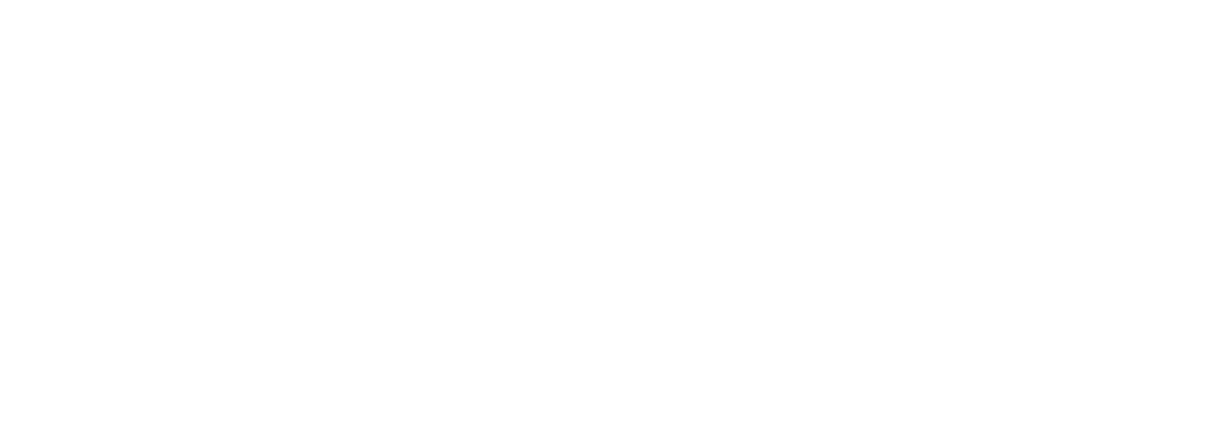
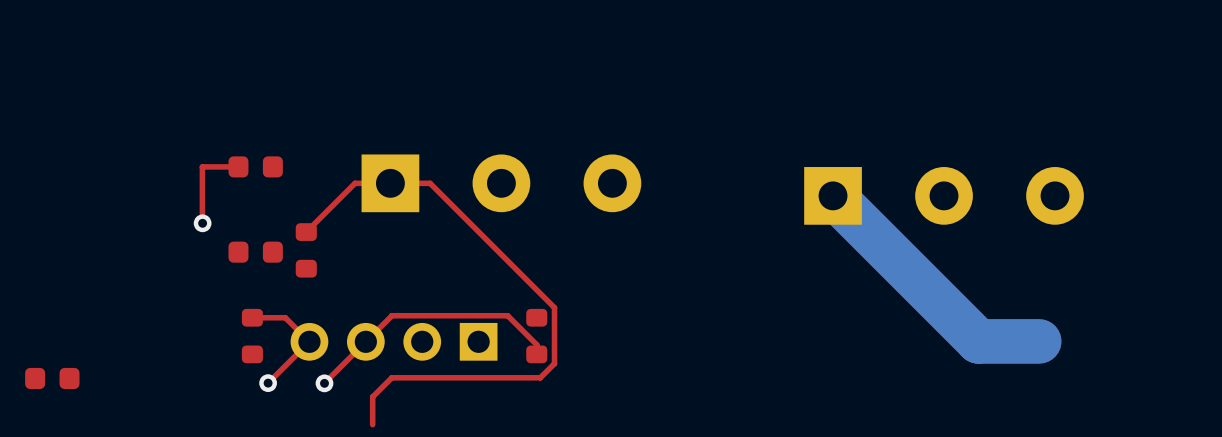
top track: none -> (238, 166) (202, 166) (202, 223)
part: none -> (255, 166)
part: none -> (501, 183)
bottom track: none -> (833, 195) (978, 341) (1039, 341)
part: none -> (944, 195)
via: none -> (202, 223)
top track: none -> (306, 232) (355, 183) (430, 183) (554, 307) (554, 363) (540, 377) (391, 377) (372, 396) (372, 424)
part: none -> (306, 250)
part: none -> (255, 252)
top track: none -> (252, 317) (285, 317) (309, 341) (268, 383)
part: none -> (252, 336)
part: none -> (536, 336)
part: none -> (394, 341)
top track: none -> (536, 354) (536, 344) (507, 315) (391, 315) (324, 383)
part: none -> (52, 378)
via: none -> (268, 383)
via: none -> (324, 383)

